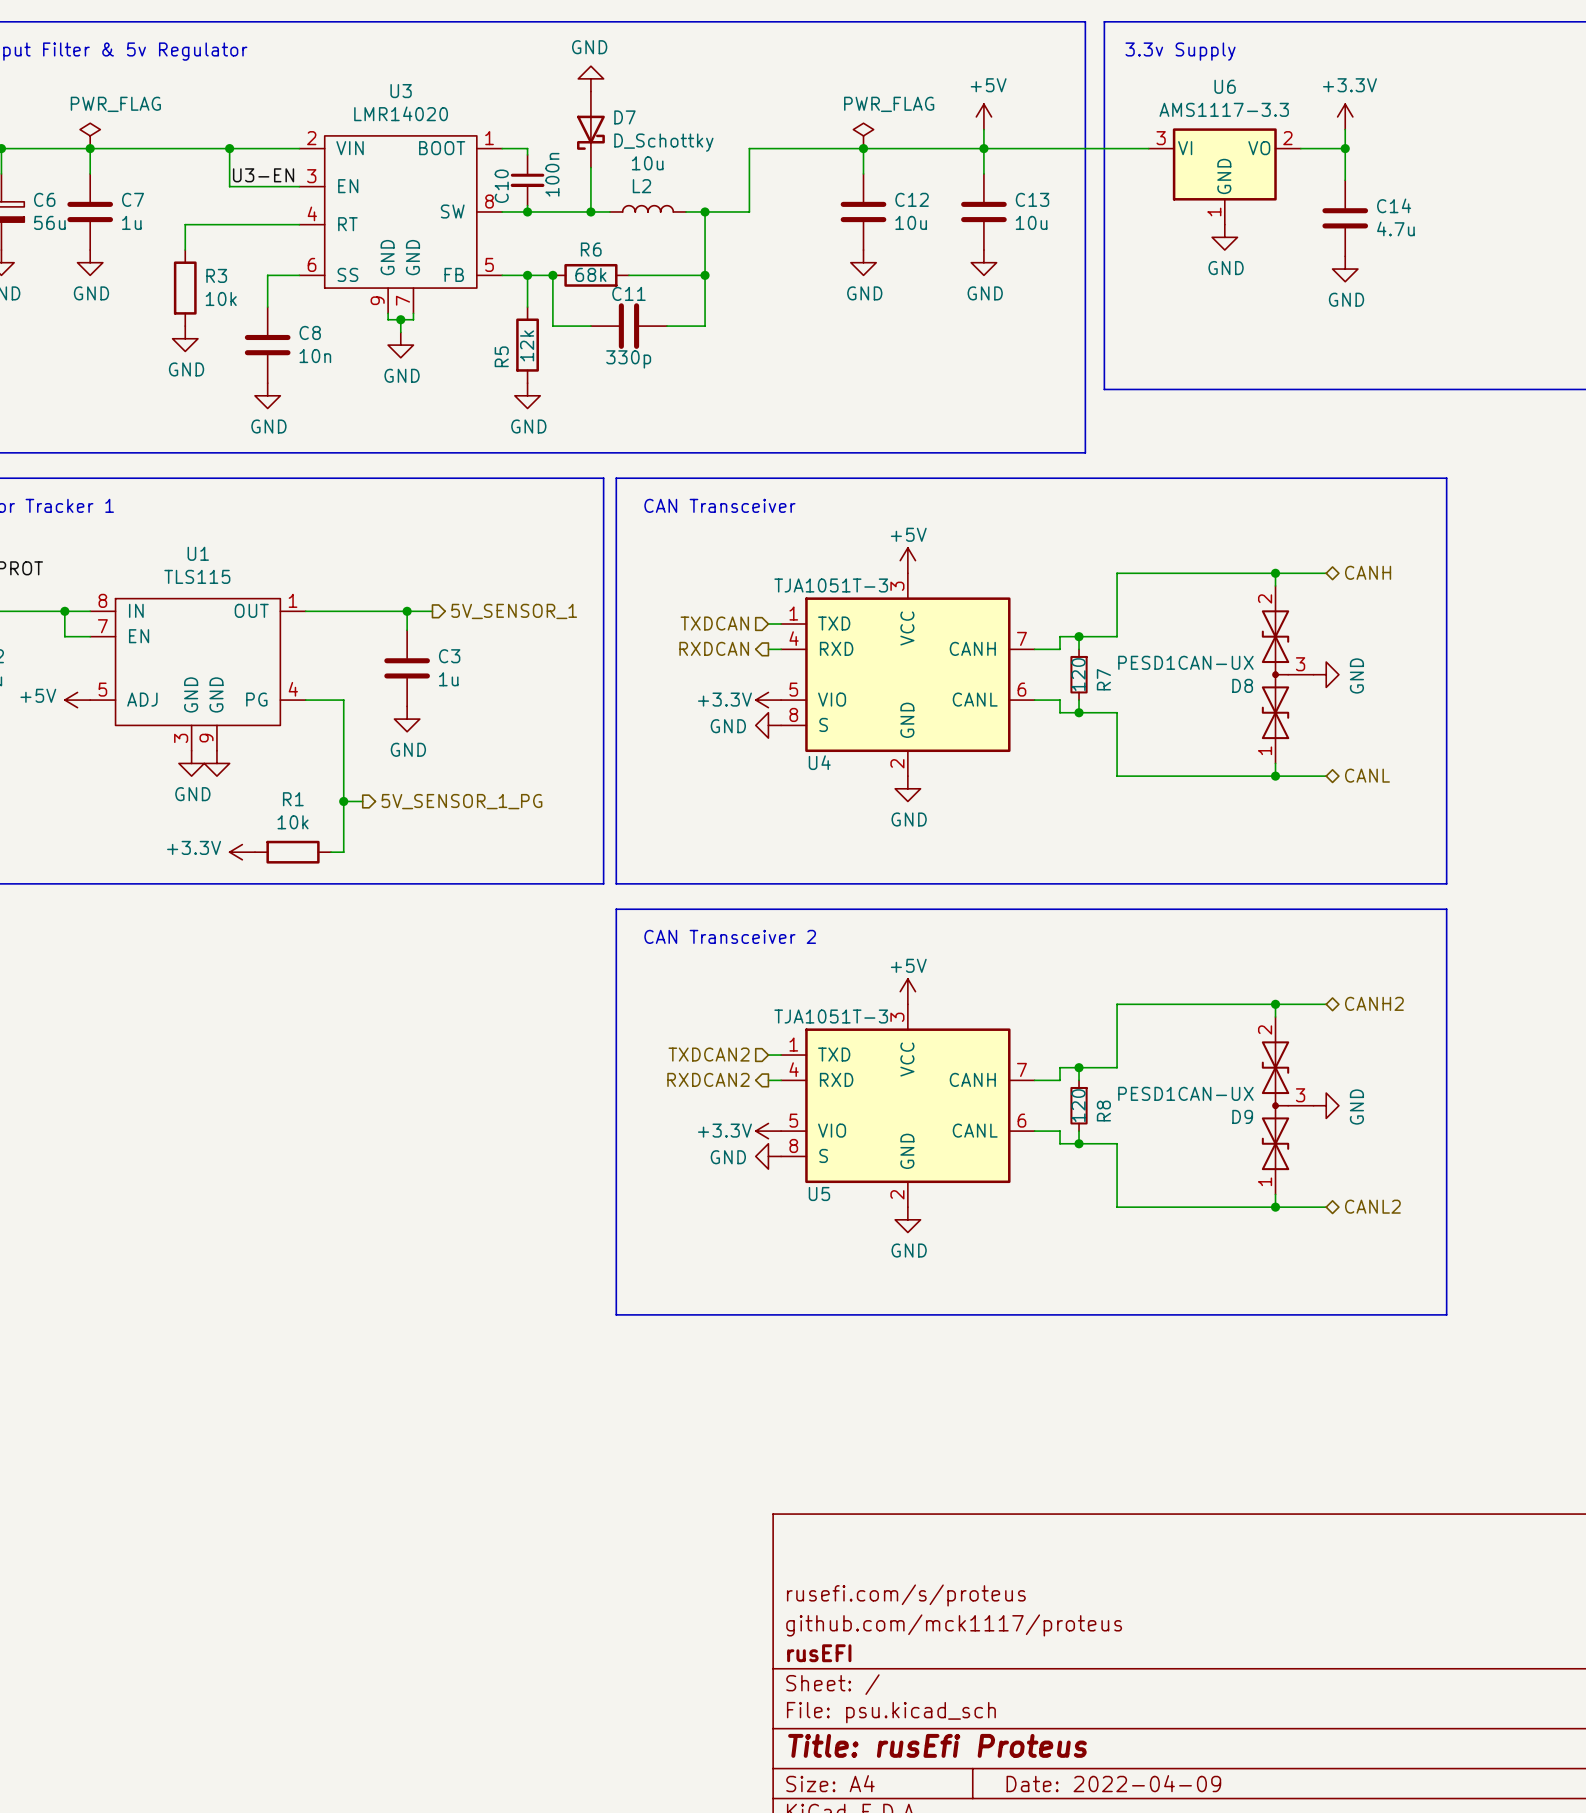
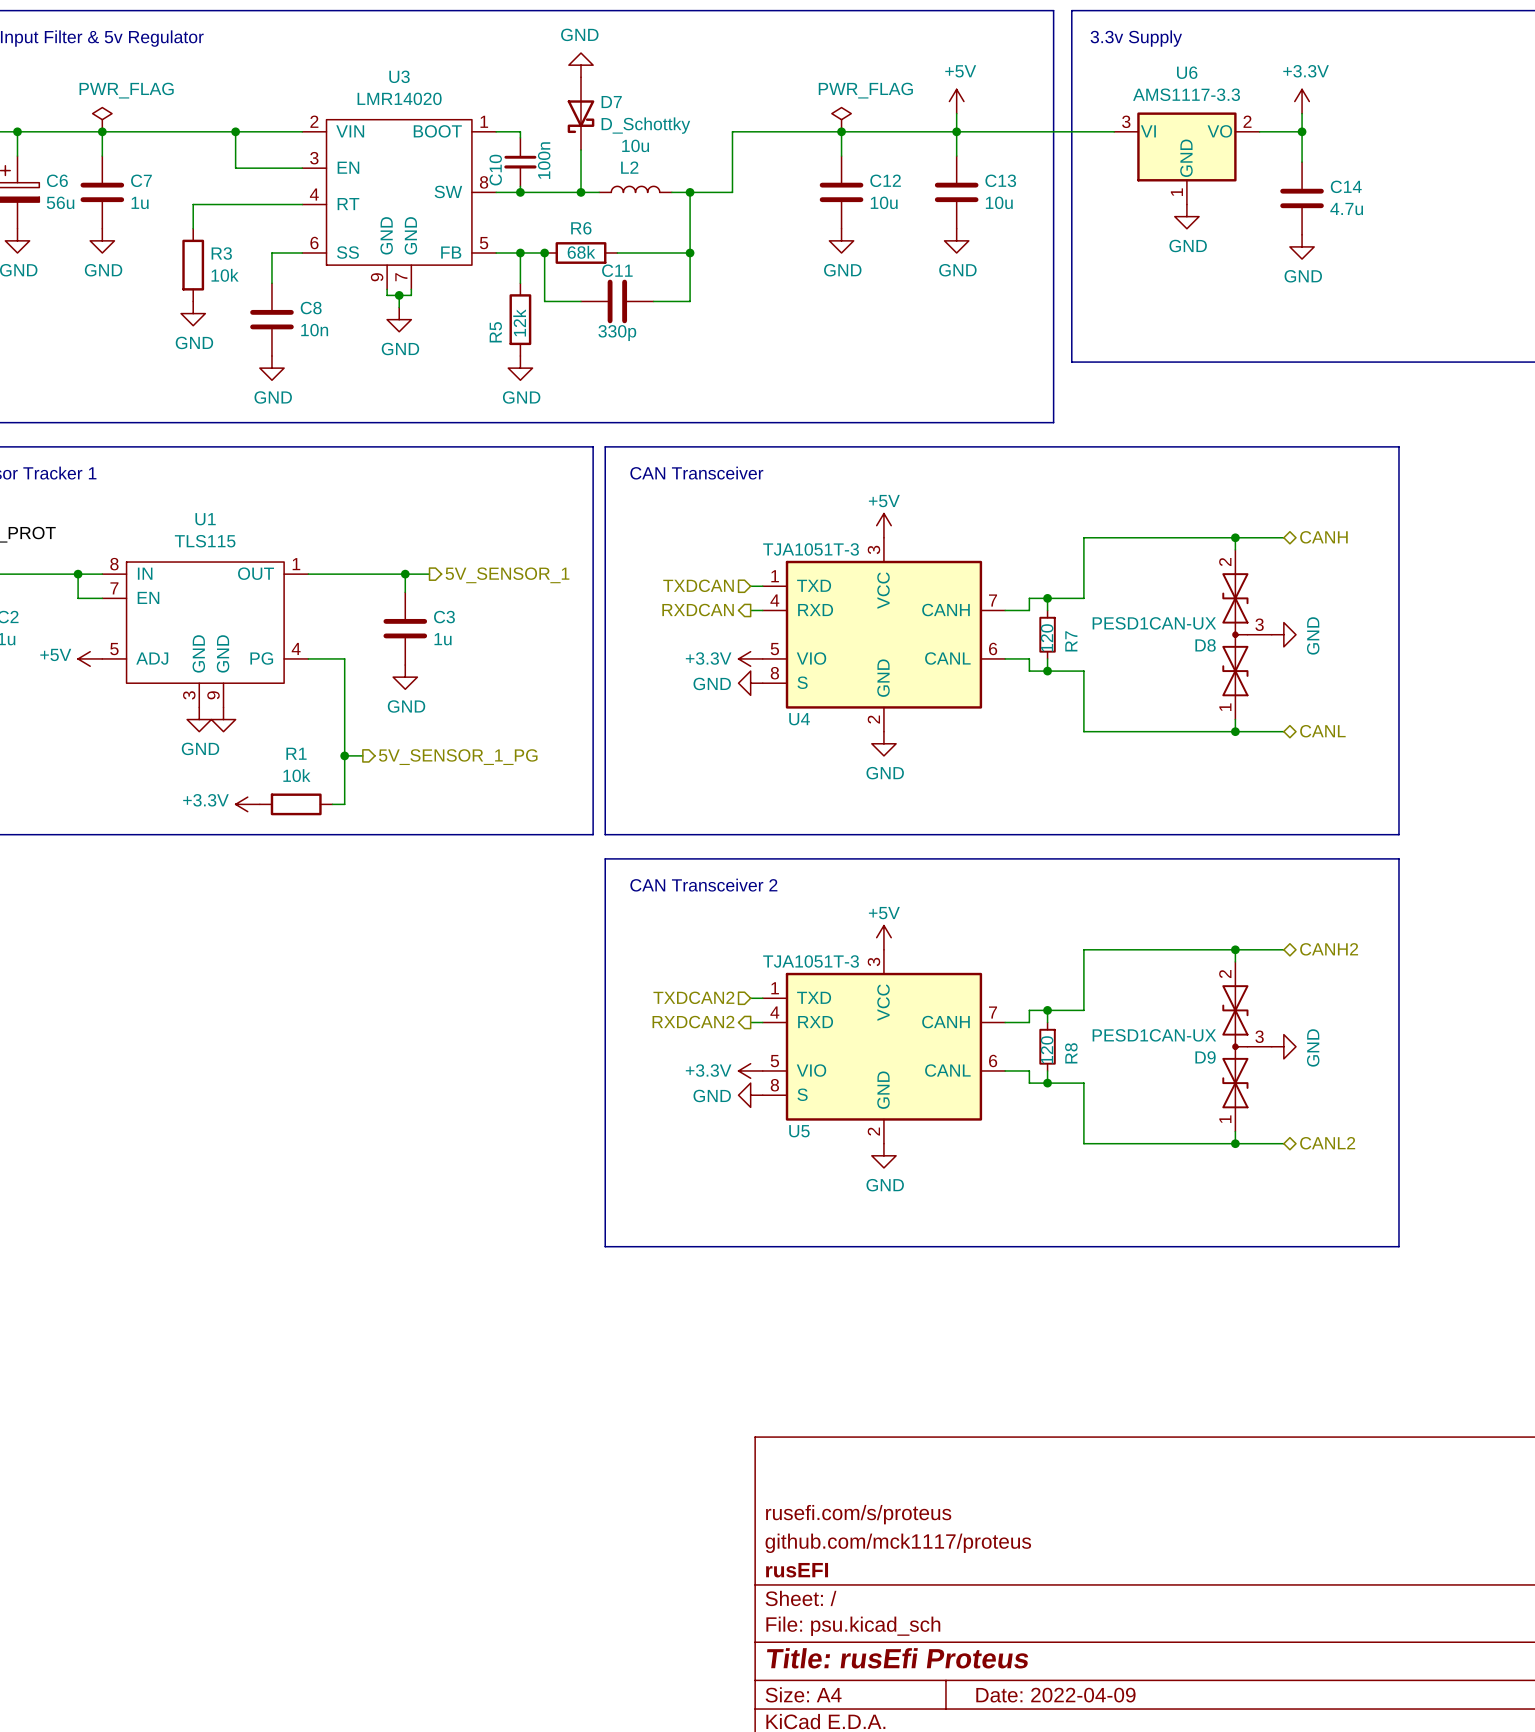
label: U3-EN (263, 175) -> none

